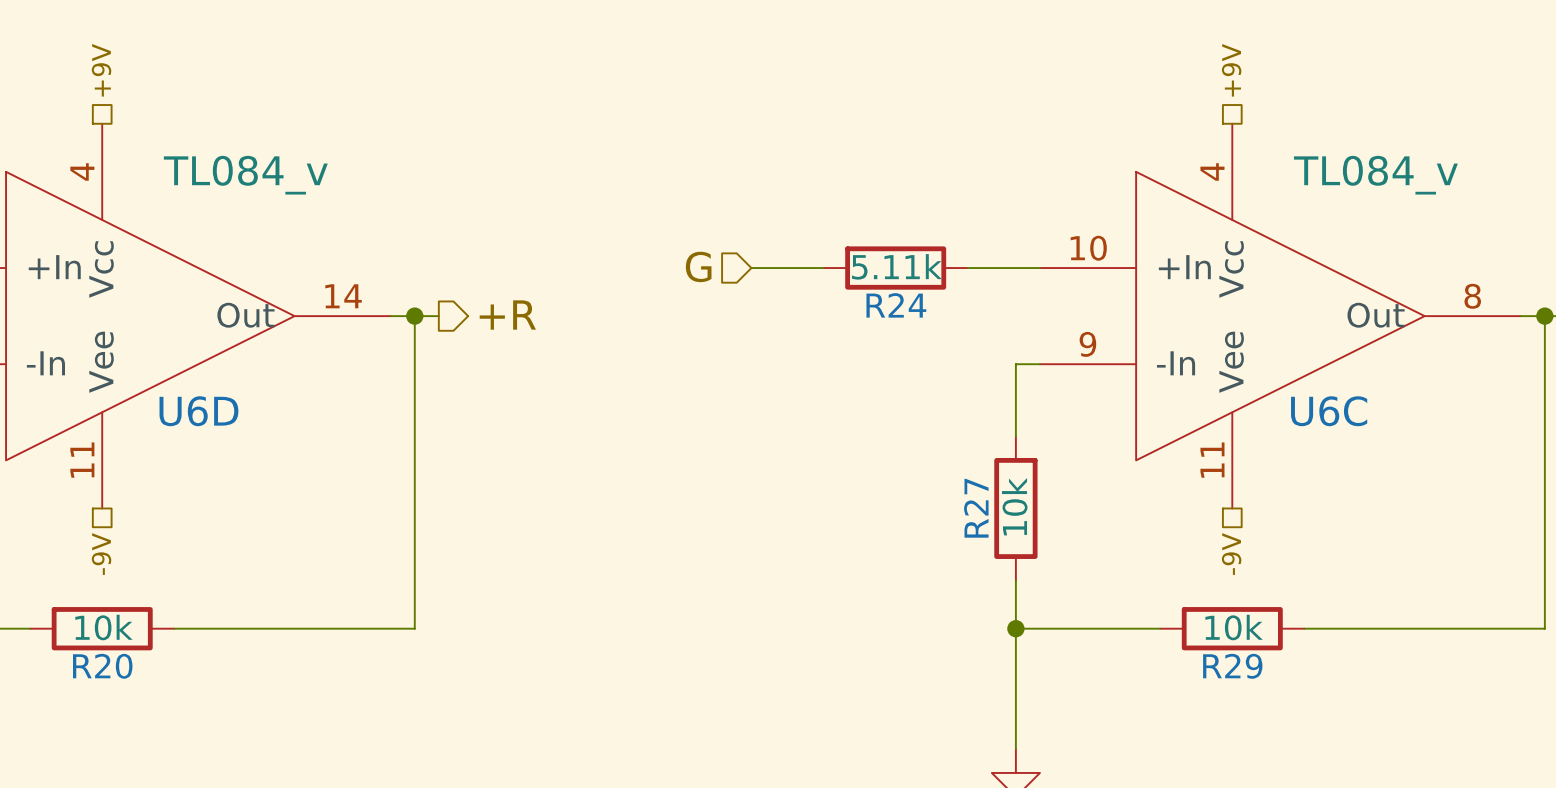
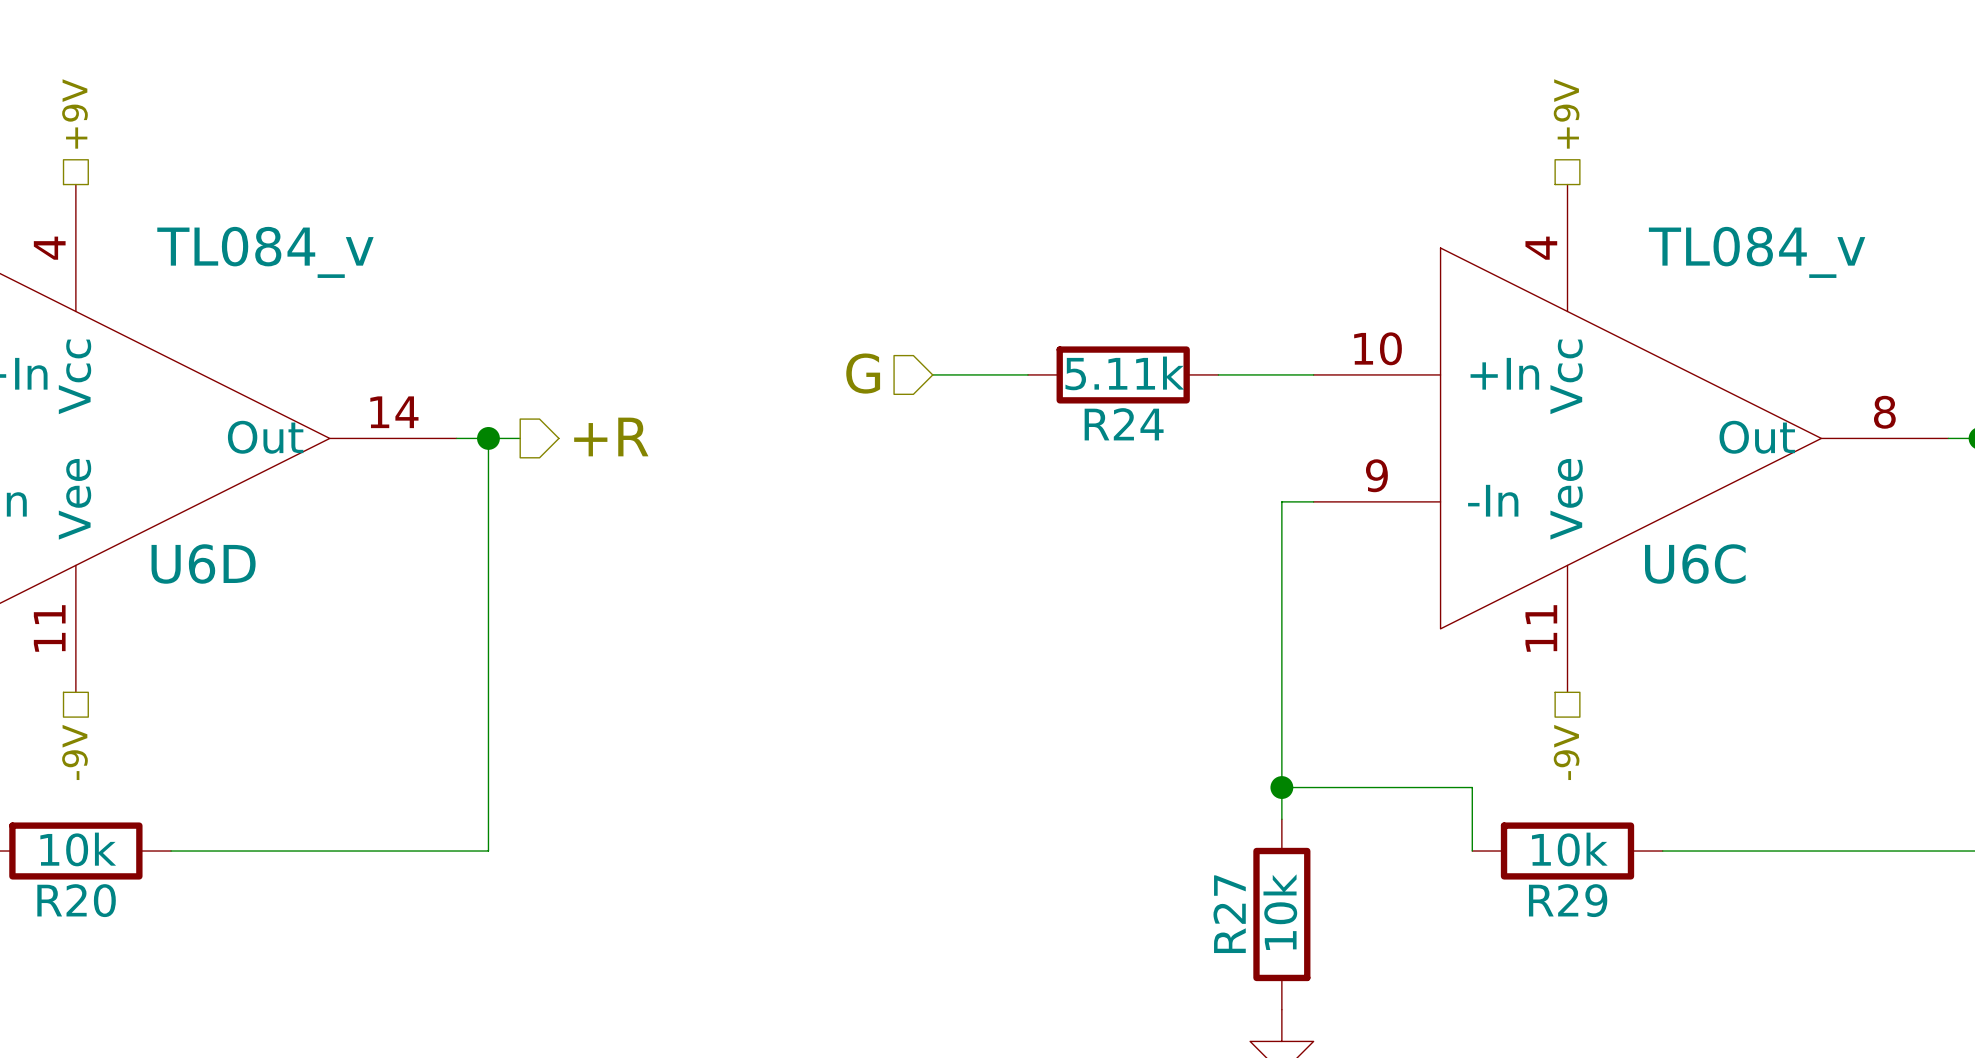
R27 position: (1015, 508) -> (1281, 914)
wire: (1015, 604) (1015, 748) -> none
wire: (1015, 628) (1160, 628) -> (1281, 597) (1281, 787) (1472, 787) (1472, 851)
junction position: (1015, 628) -> (1281, 787)

